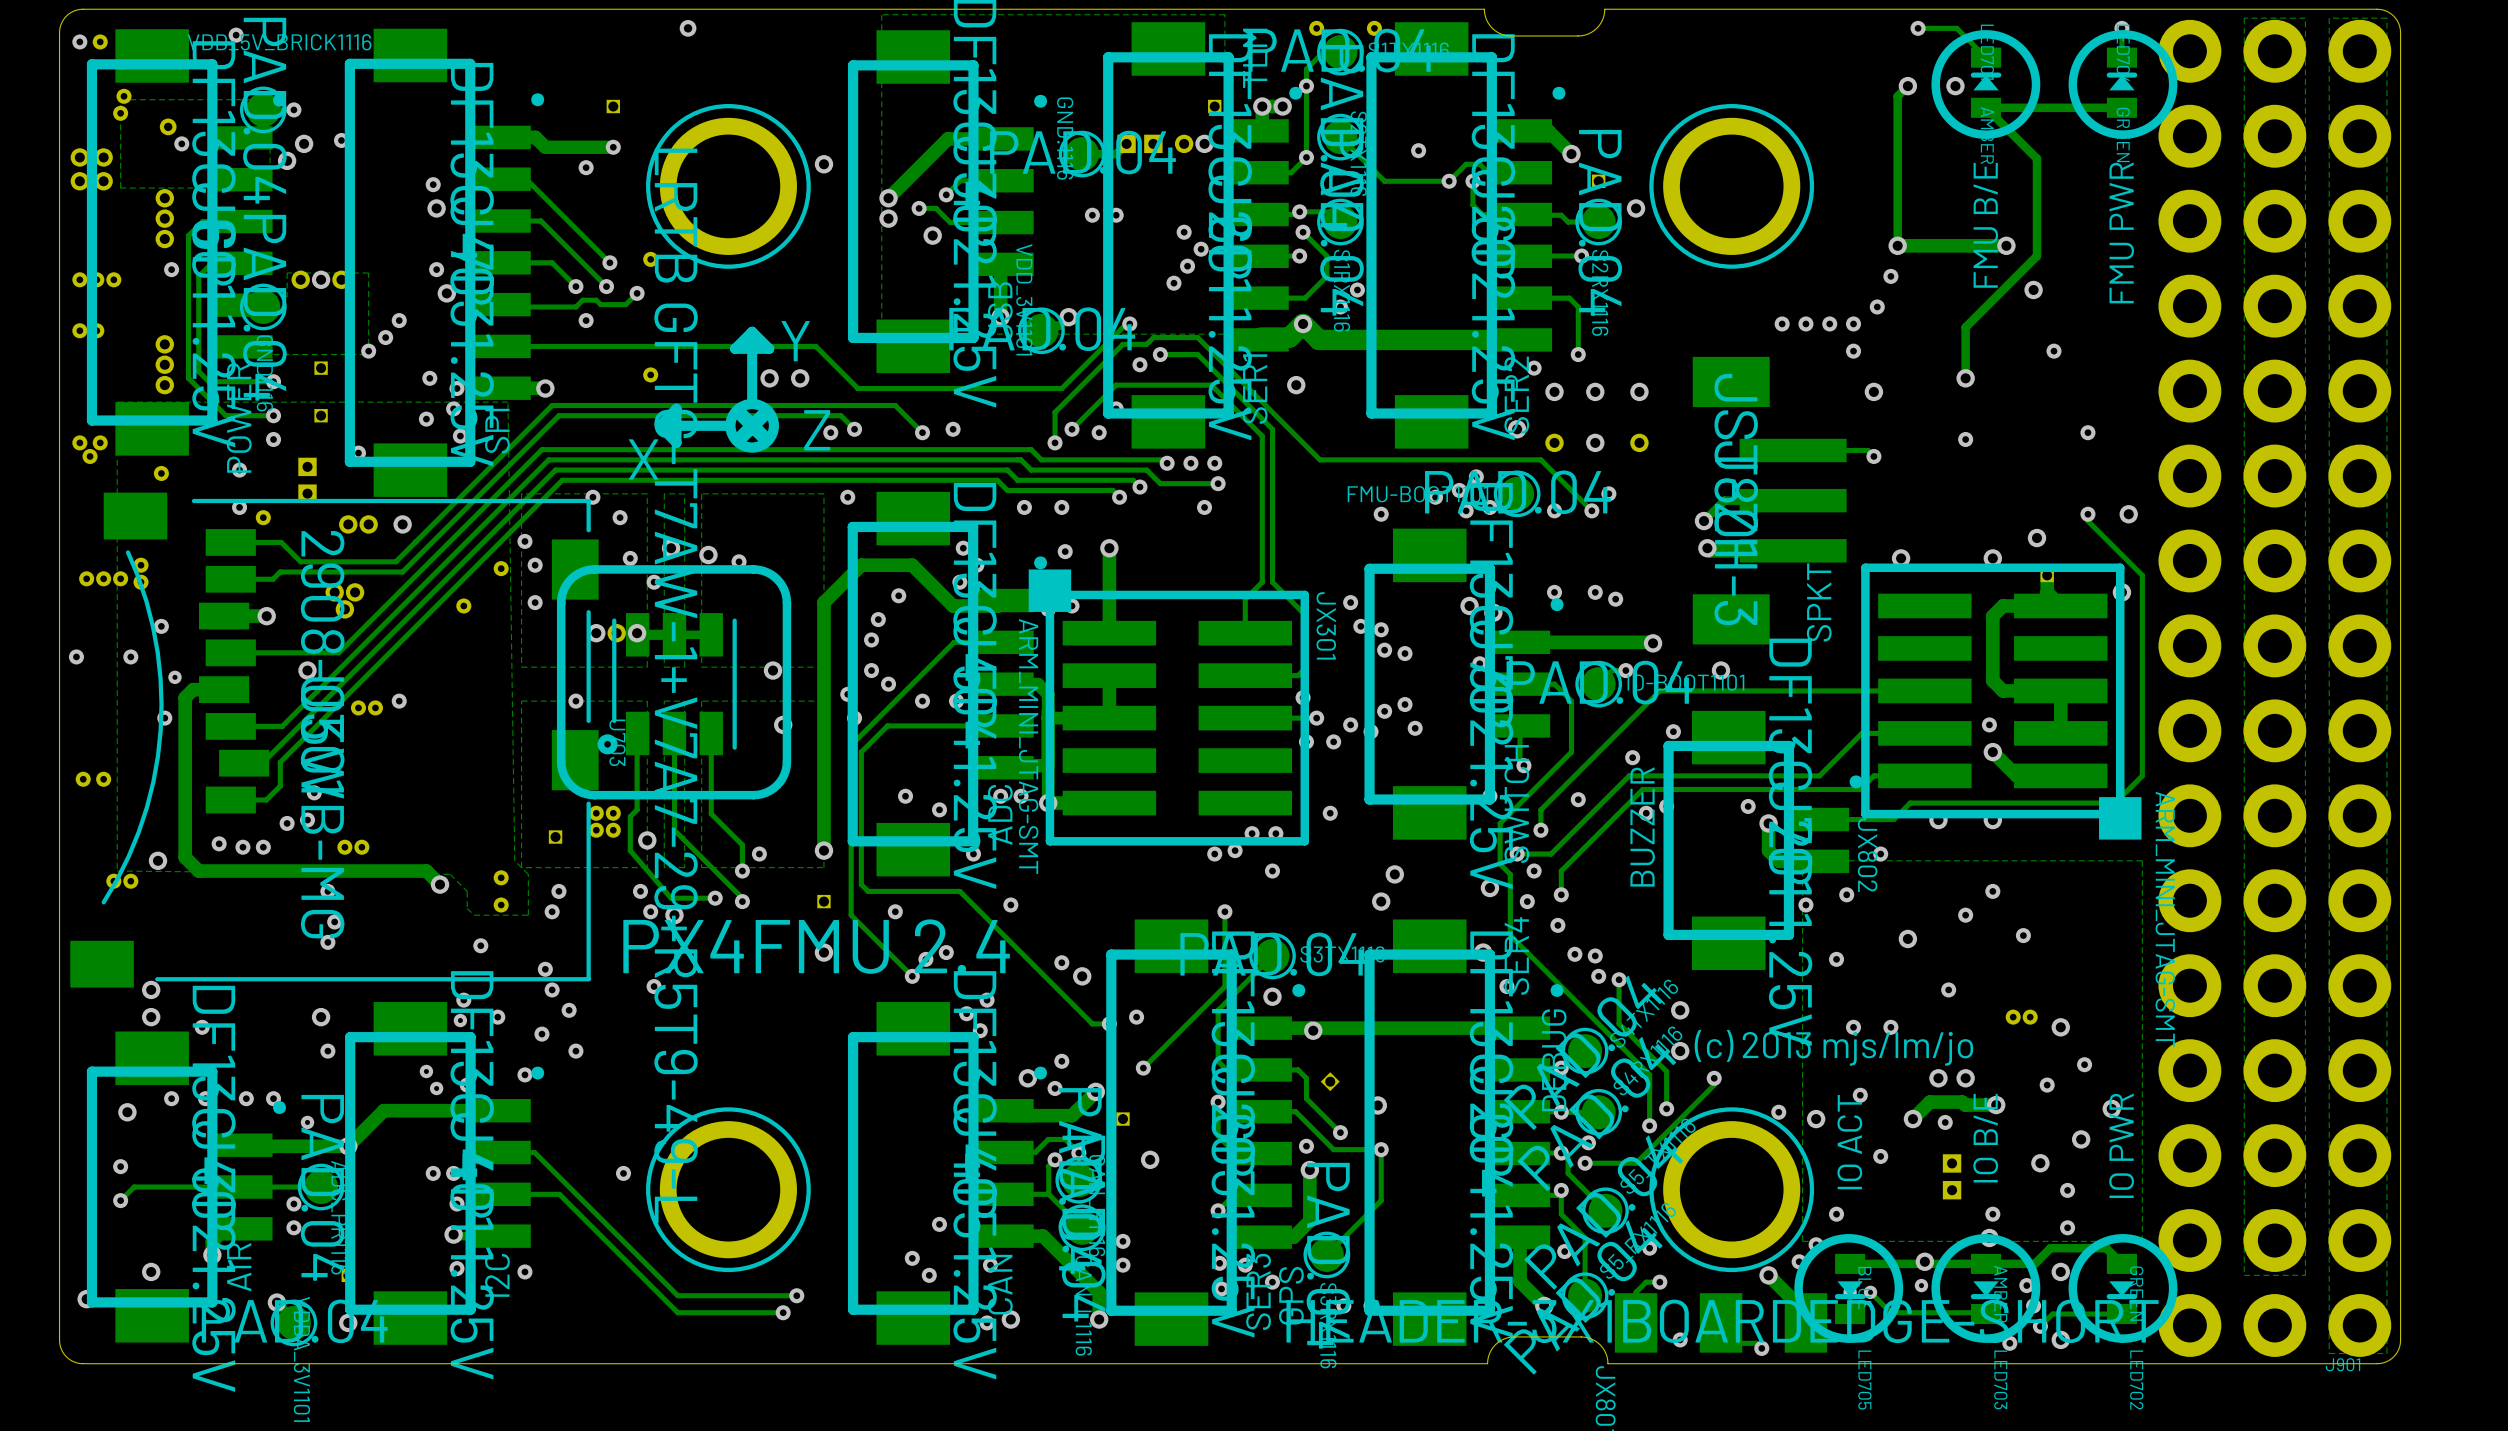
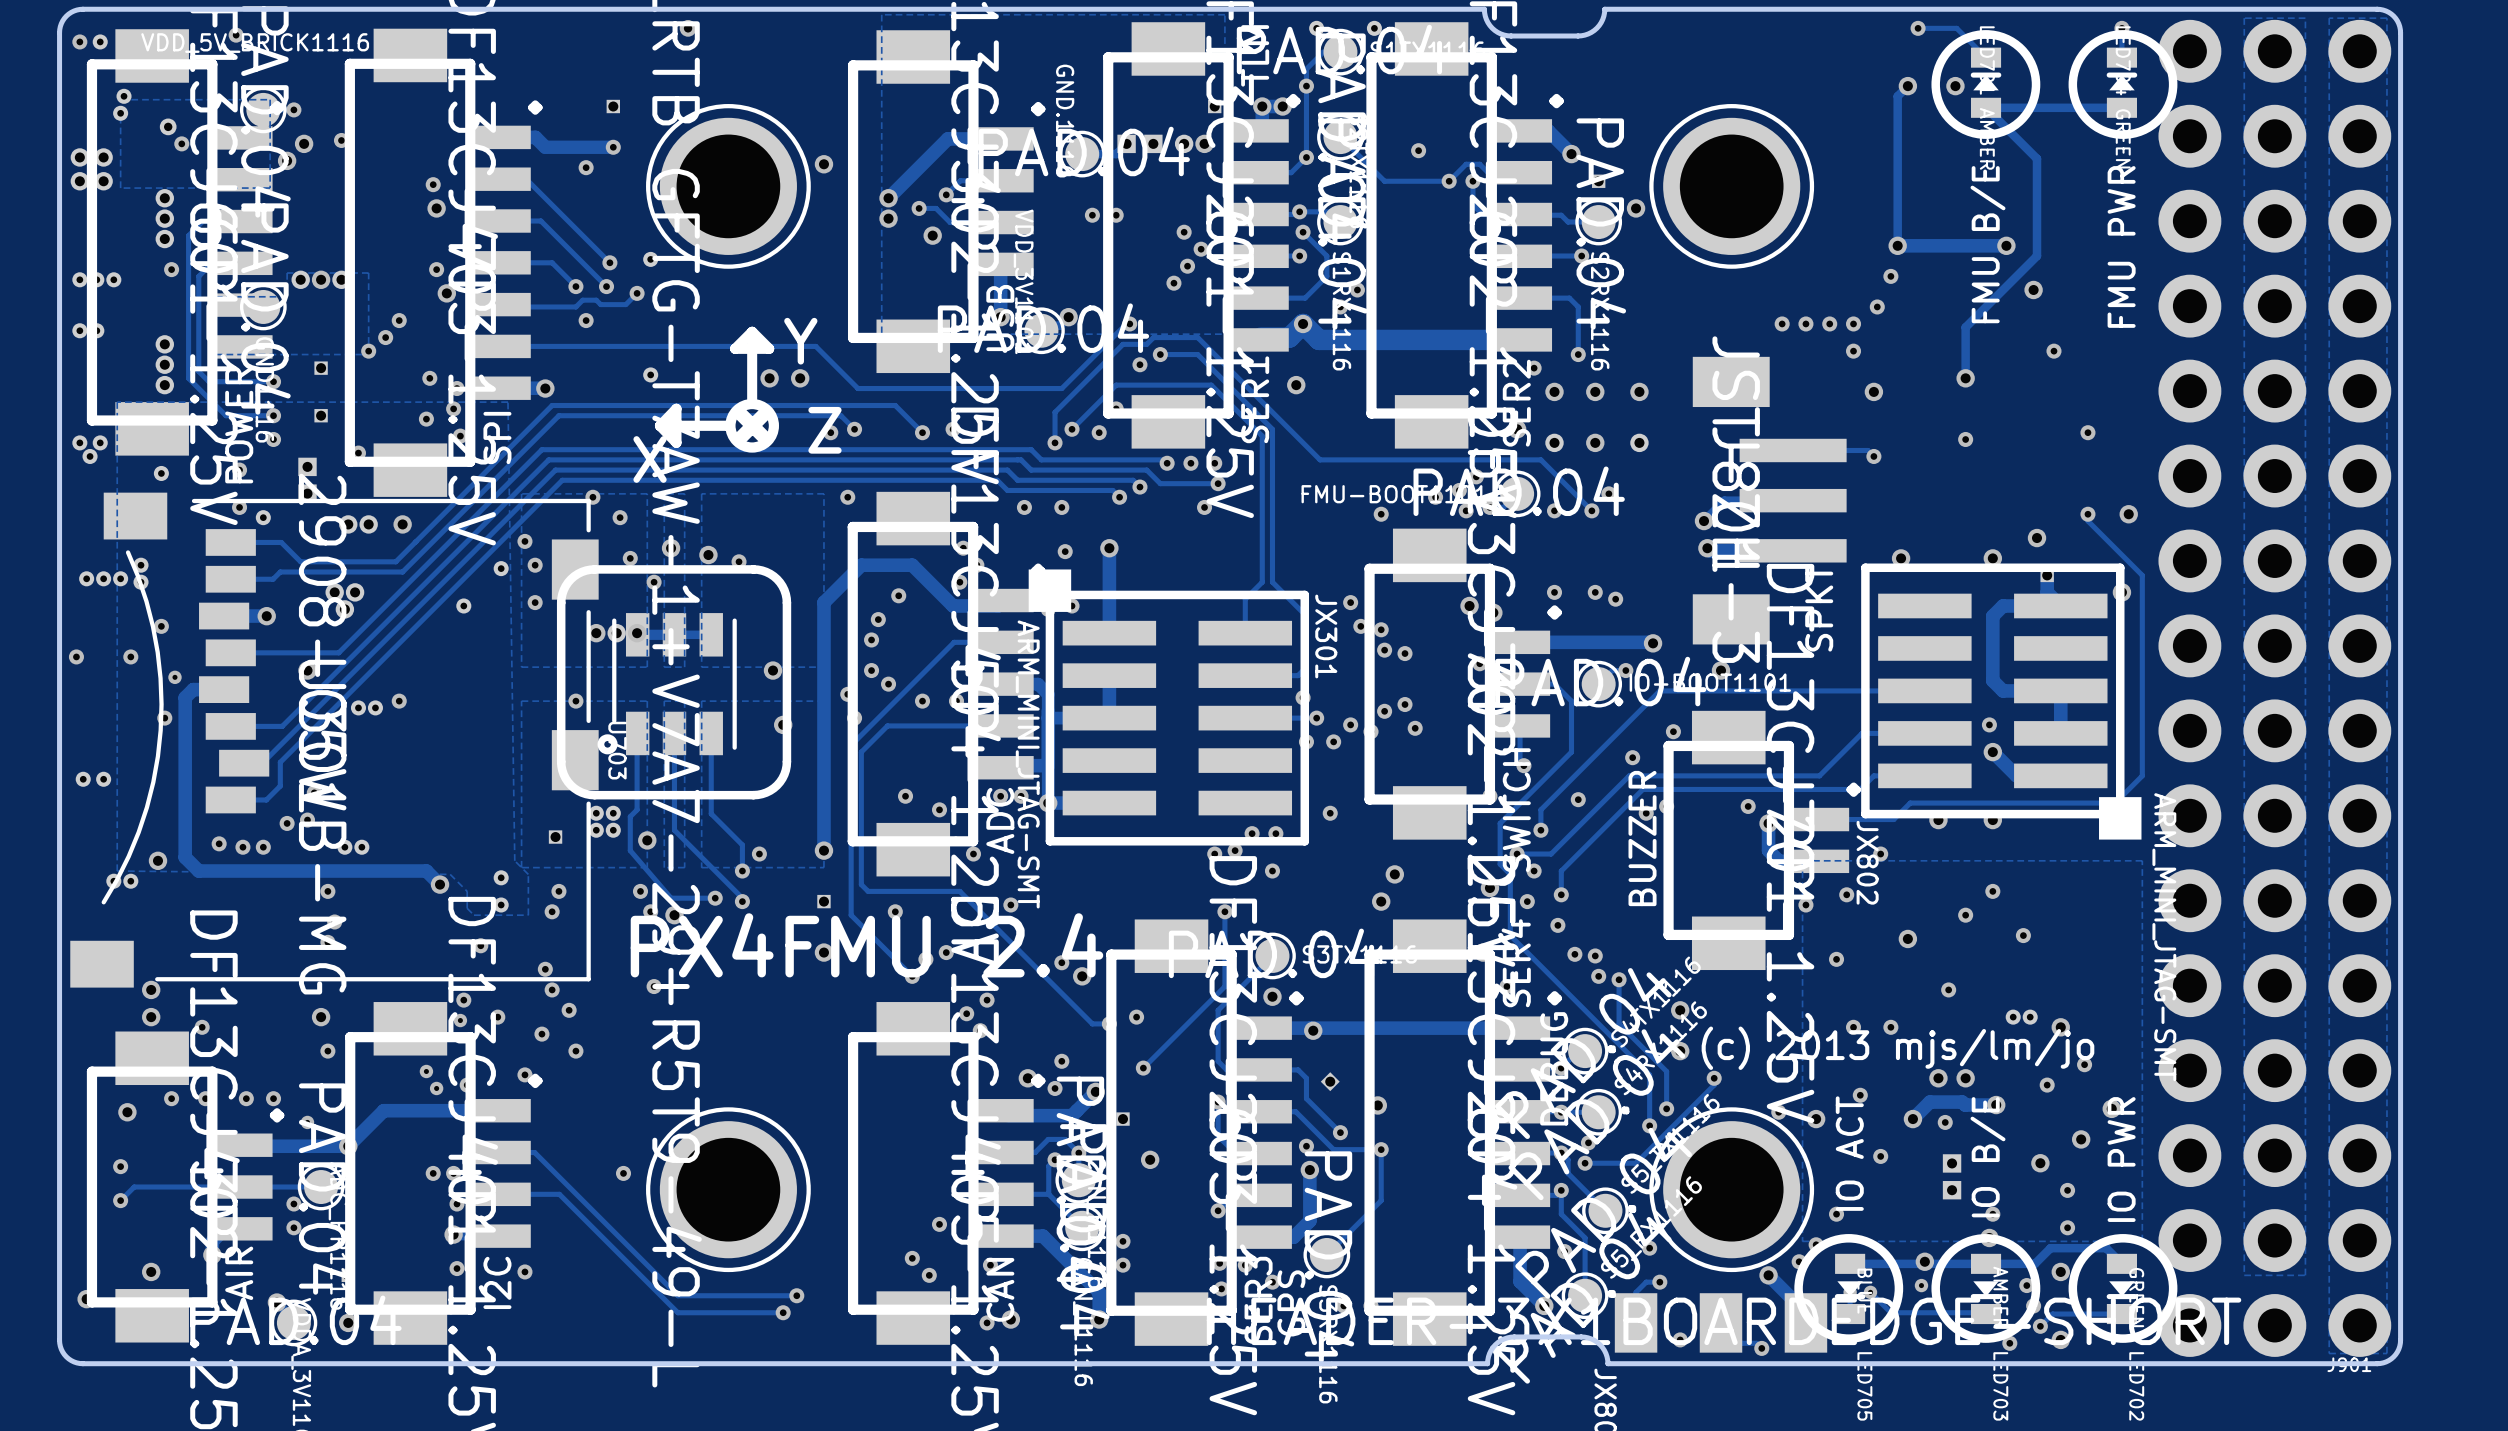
board edge width: thin (2377, 9) (1604, 9) (1602, 19) (1596, 28) (1588, 33) (1578, 36) (1504, 35) (1489, 25) (1484, 9) (82, 9) (71, 12) (62, 20) (59, 32) (59, 1340) (62, 1352) (71, 1360) (82, 1363) (1487, 1363) (1493, 1347) (1507, 1337) (1581, 1336) (1591, 1338) (1600, 1344) (1605, 1353) (1607, 1363) (2377, 1363) (2388, 1360) (2397, 1352) (2400, 1340) (2400, 32) (2398, 23) (2393, 16) (2386, 11) (2377, 9) -> thick (2377, 9) (1604, 9) (1602, 19) (1596, 28) (1588, 33) (1578, 36) (1504, 35) (1489, 25) (1484, 9) (82, 9) (71, 12) (62, 20) (59, 32) (59, 1340) (62, 1352) (71, 1360) (82, 1363) (1487, 1363) (1493, 1347) (1507, 1337) (1581, 1336) (1591, 1338) (1600, 1344) (1605, 1353) (1607, 1363) (2377, 1363) (2388, 1360) (2397, 1352) (2400, 1340) (2400, 32) (2398, 23) (2393, 16) (2386, 11) (2377, 9)

